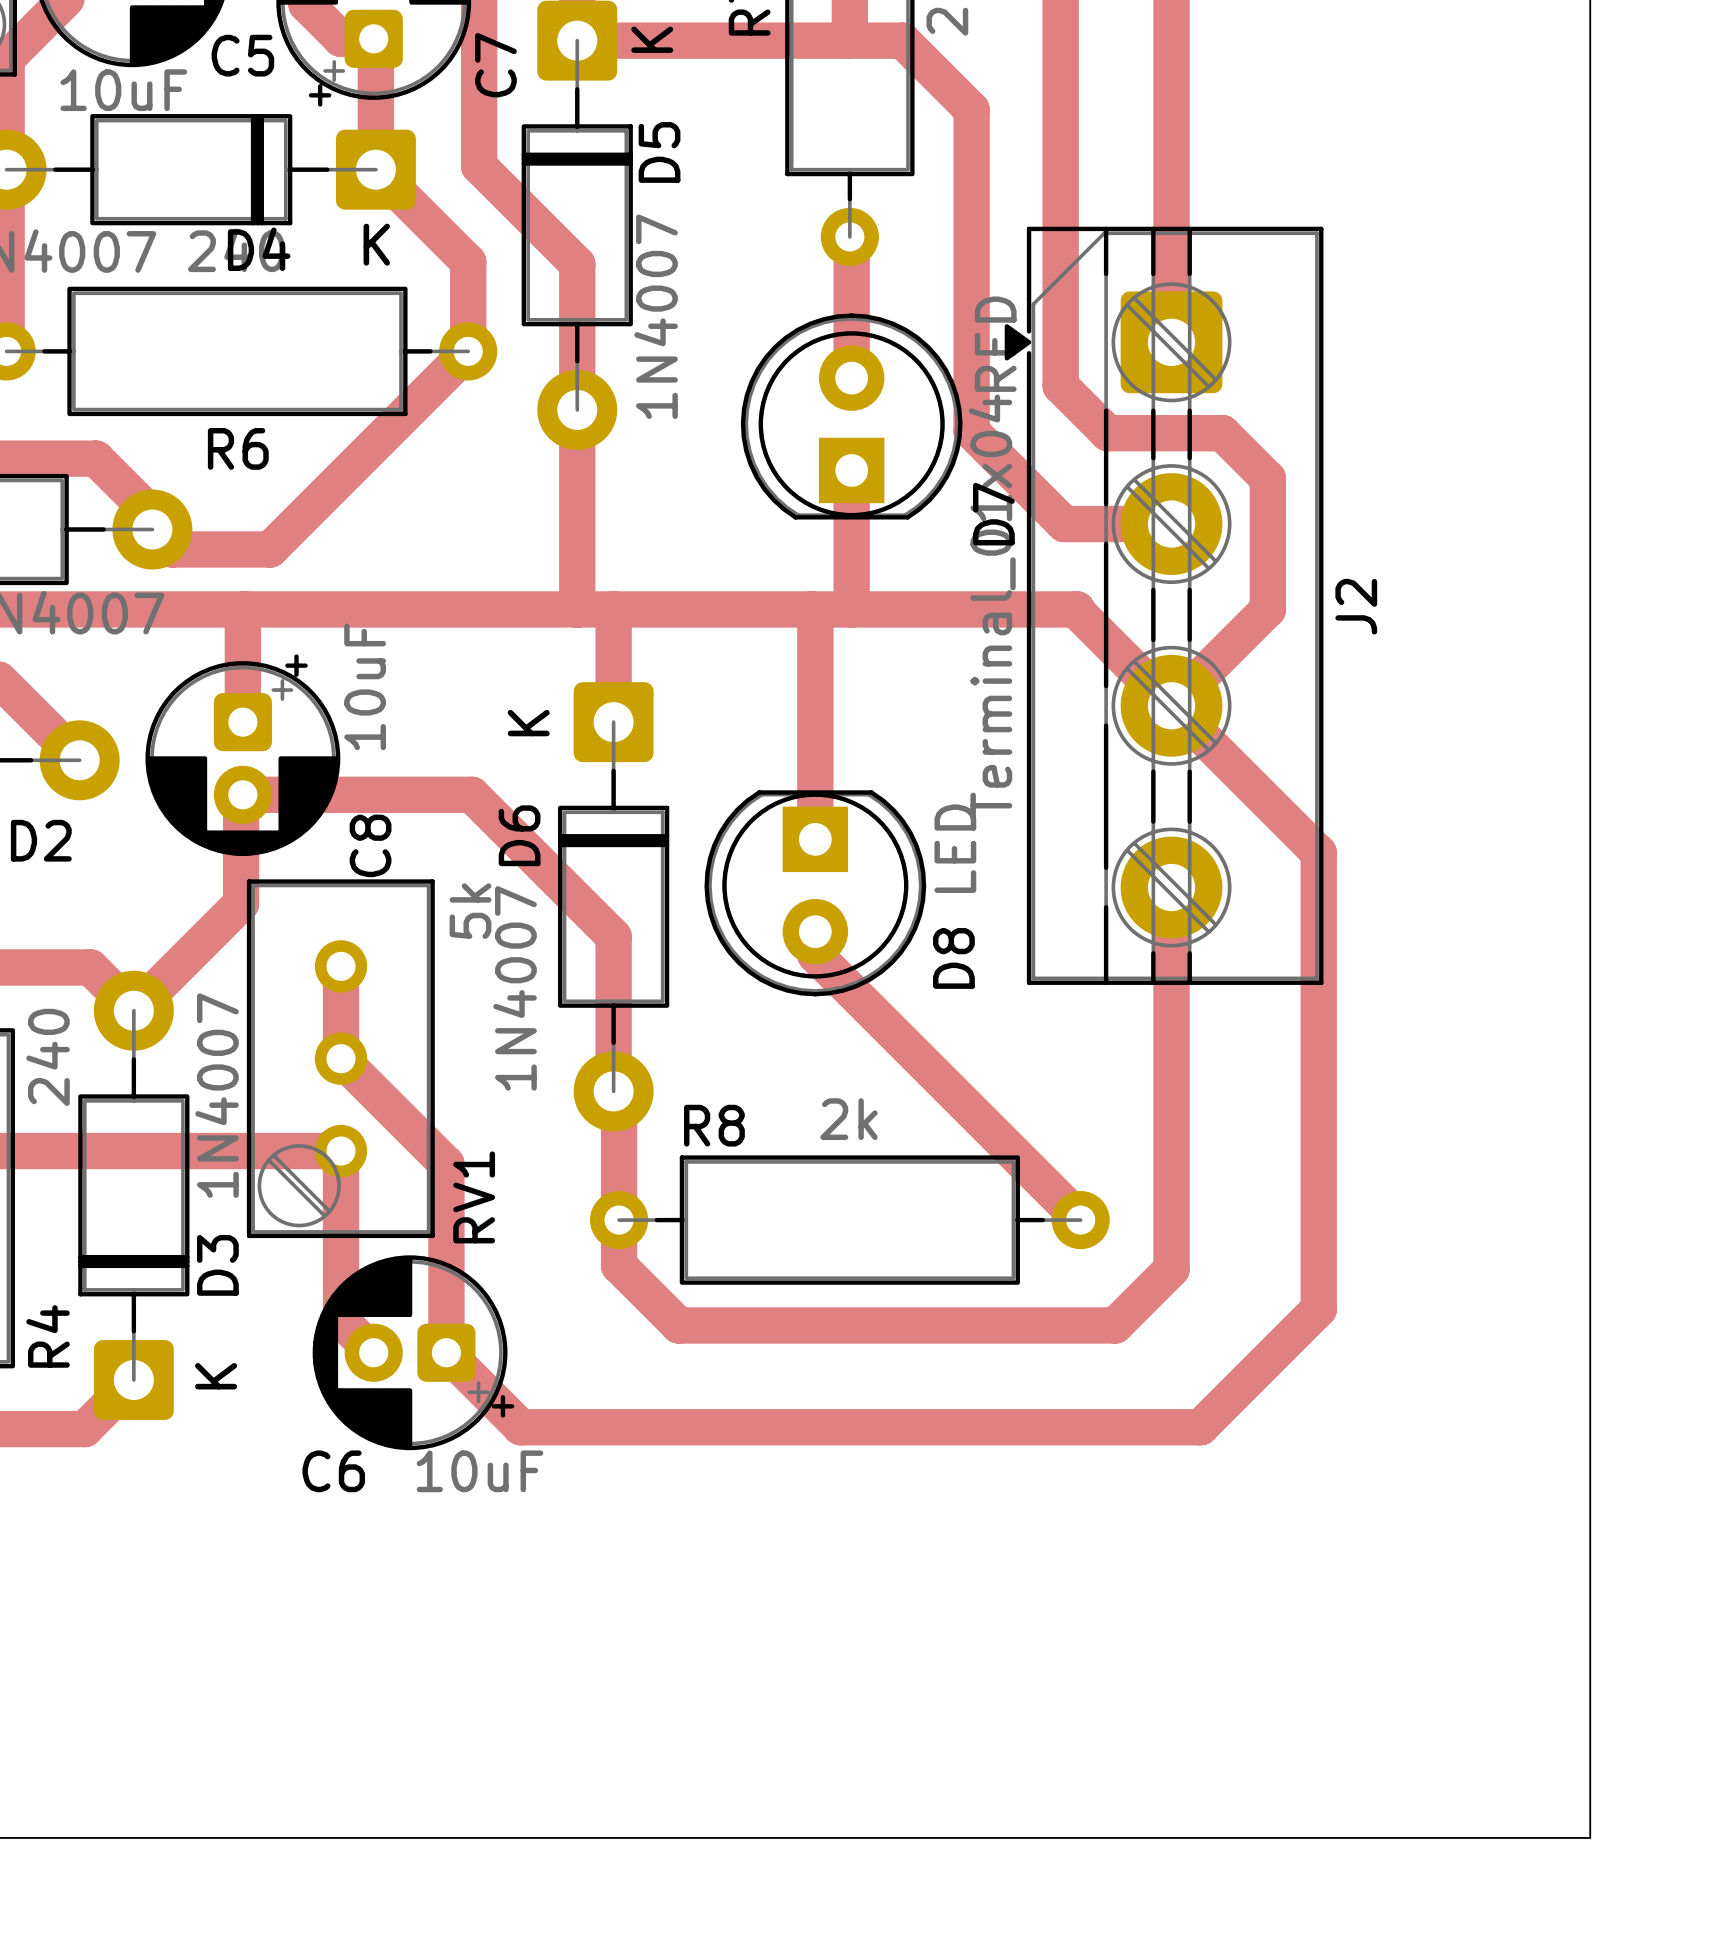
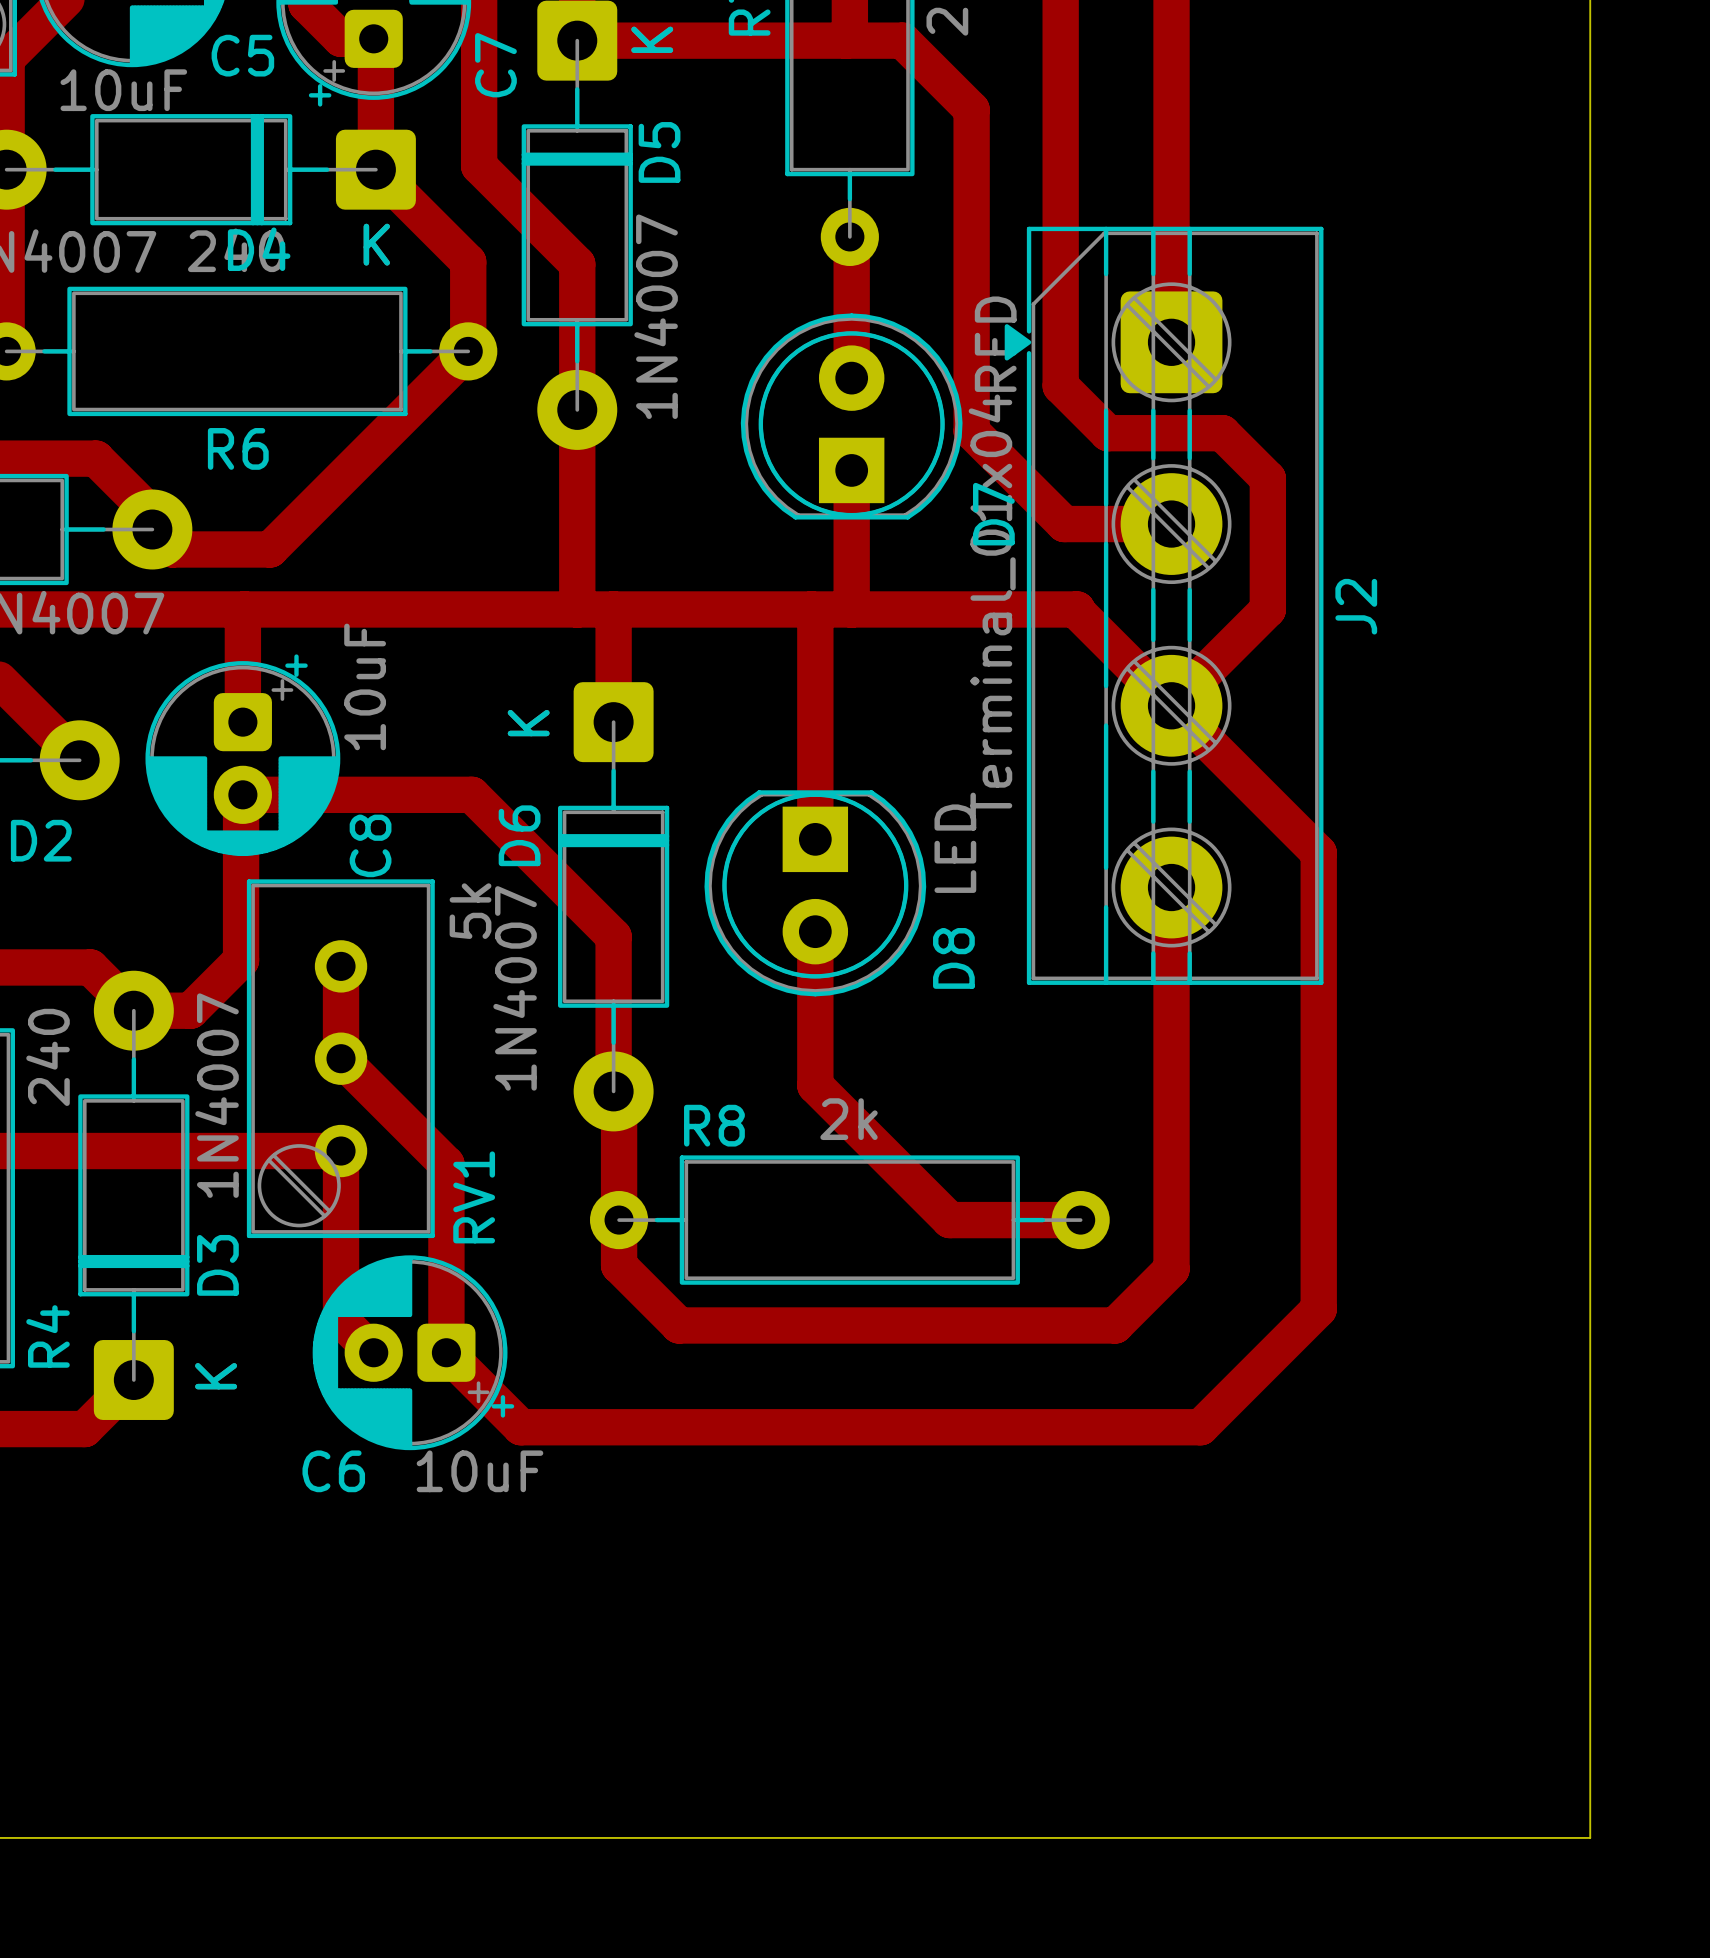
track: (241, 903) (133, 1010) -> (241, 903) (241, 960) (190, 1010) (133, 1010)
track: (815, 954) (1080, 1220) -> (815, 954) (815, 1085) (949, 1220) (1080, 1220)

